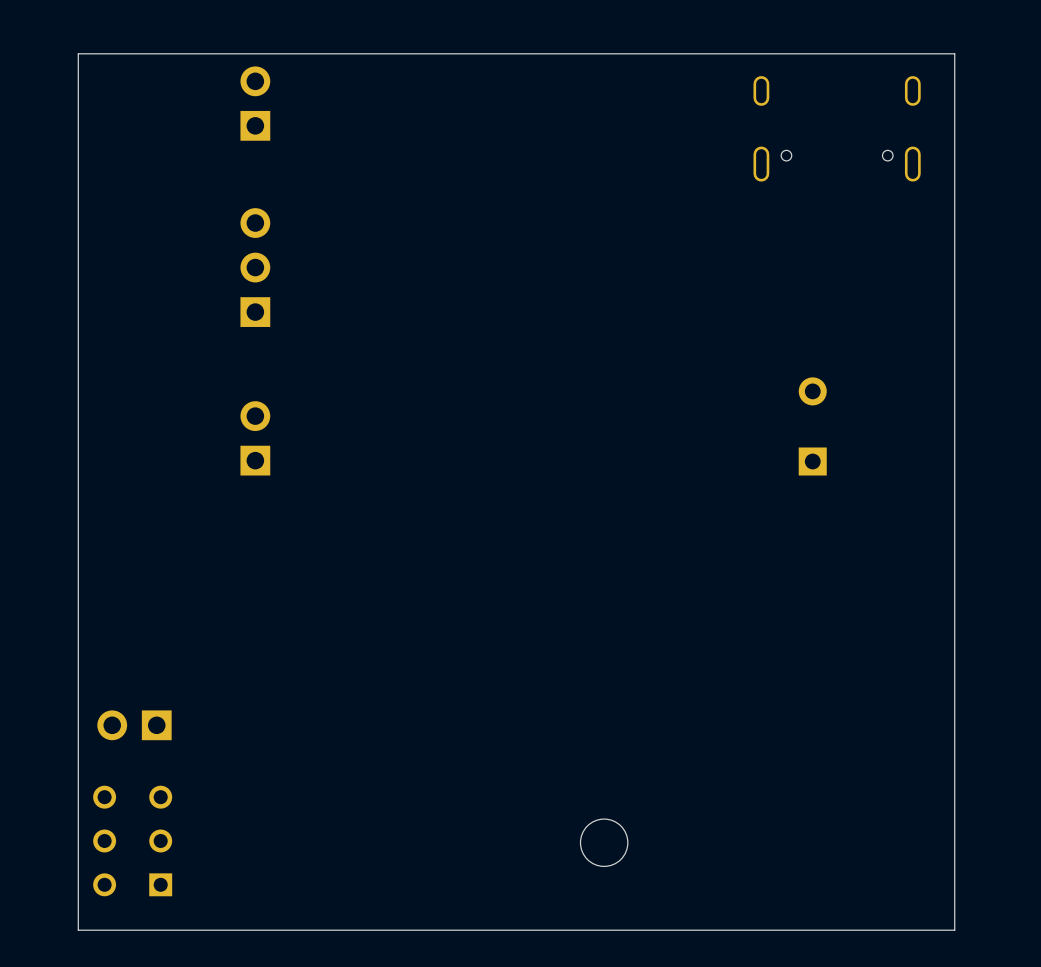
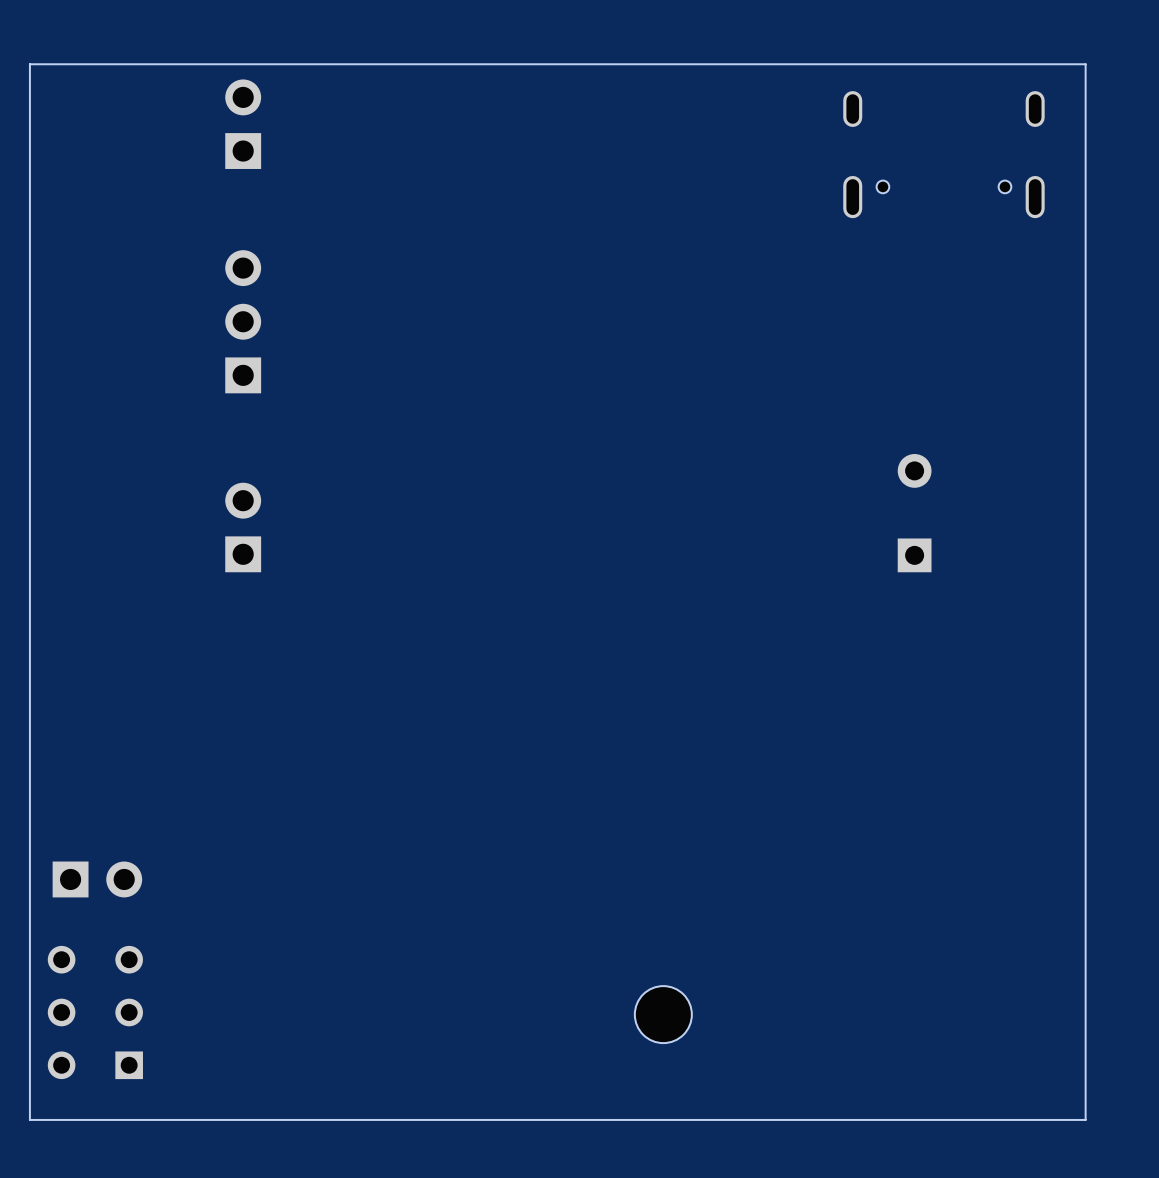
part rotation: 0° (134, 725) -> 180° (97, 879)

